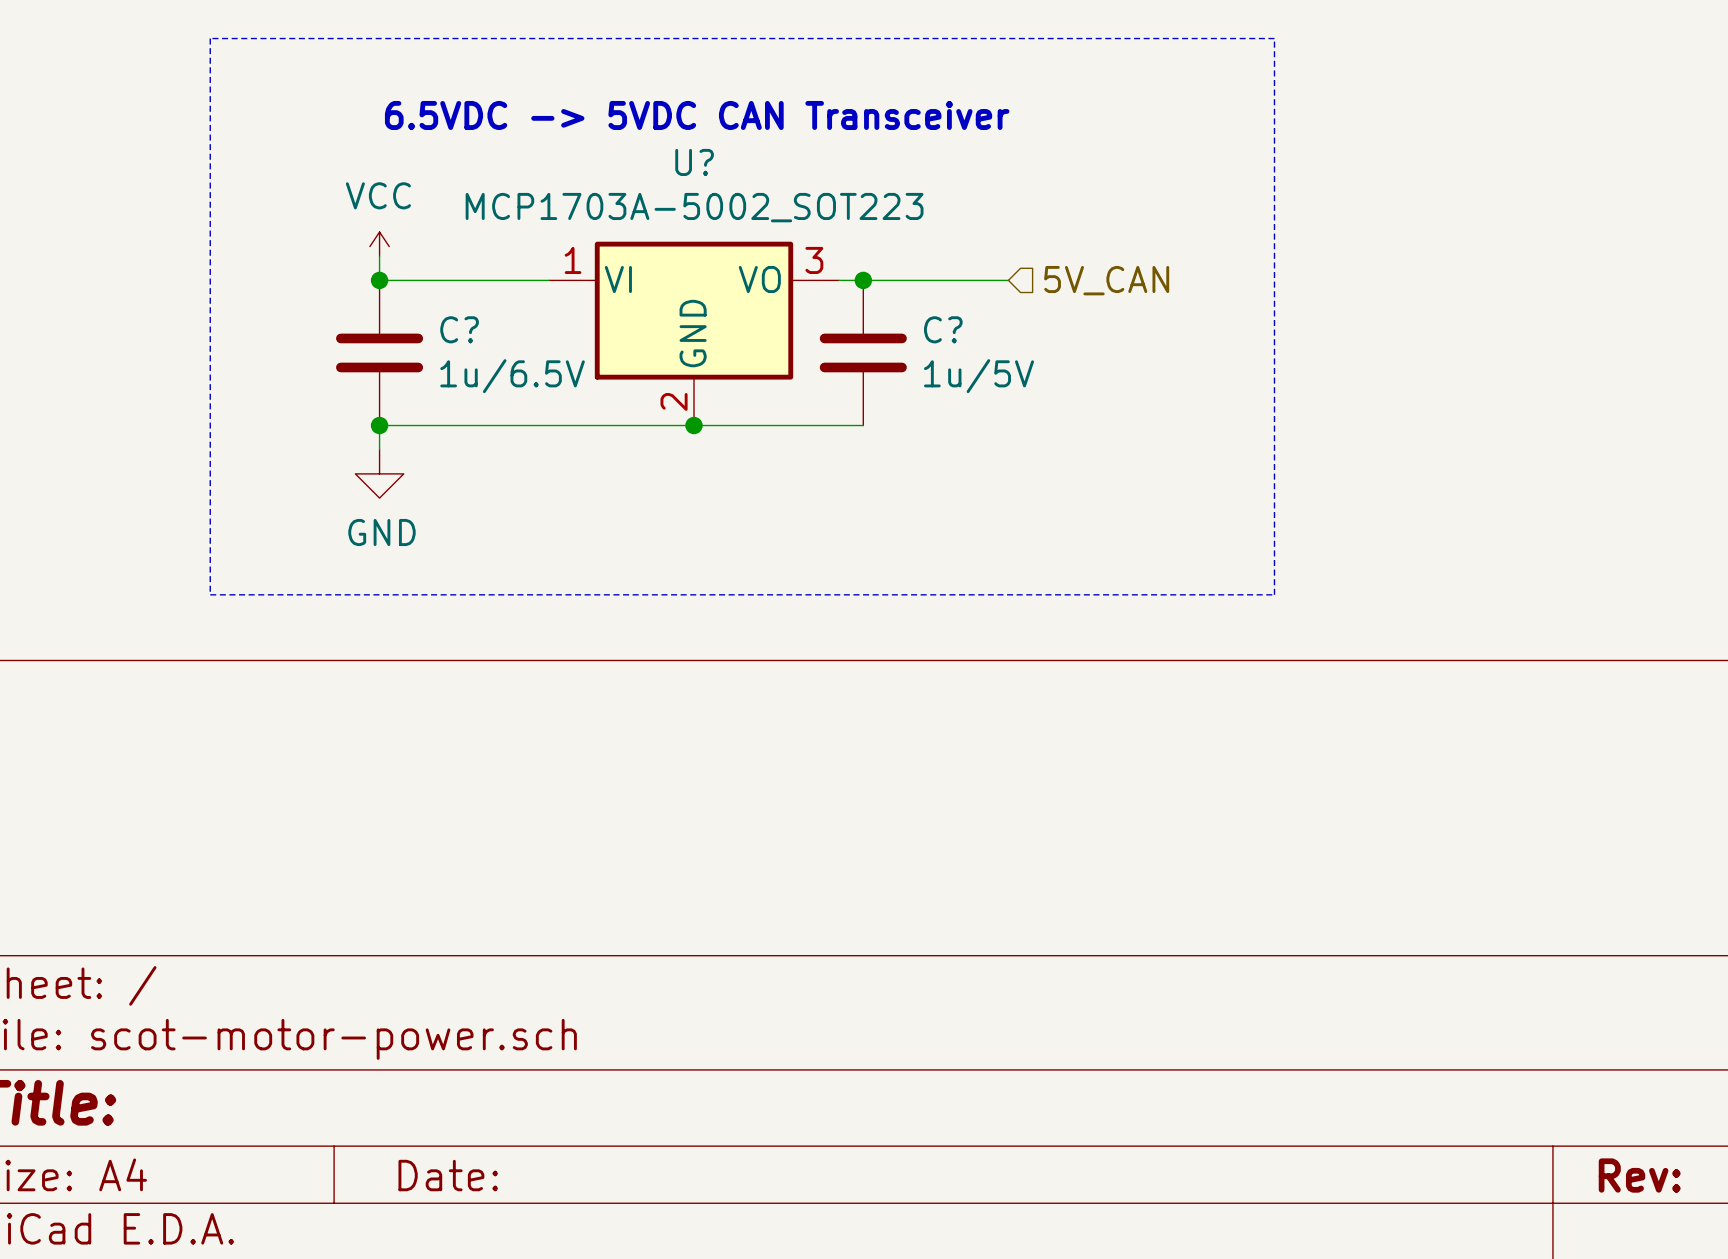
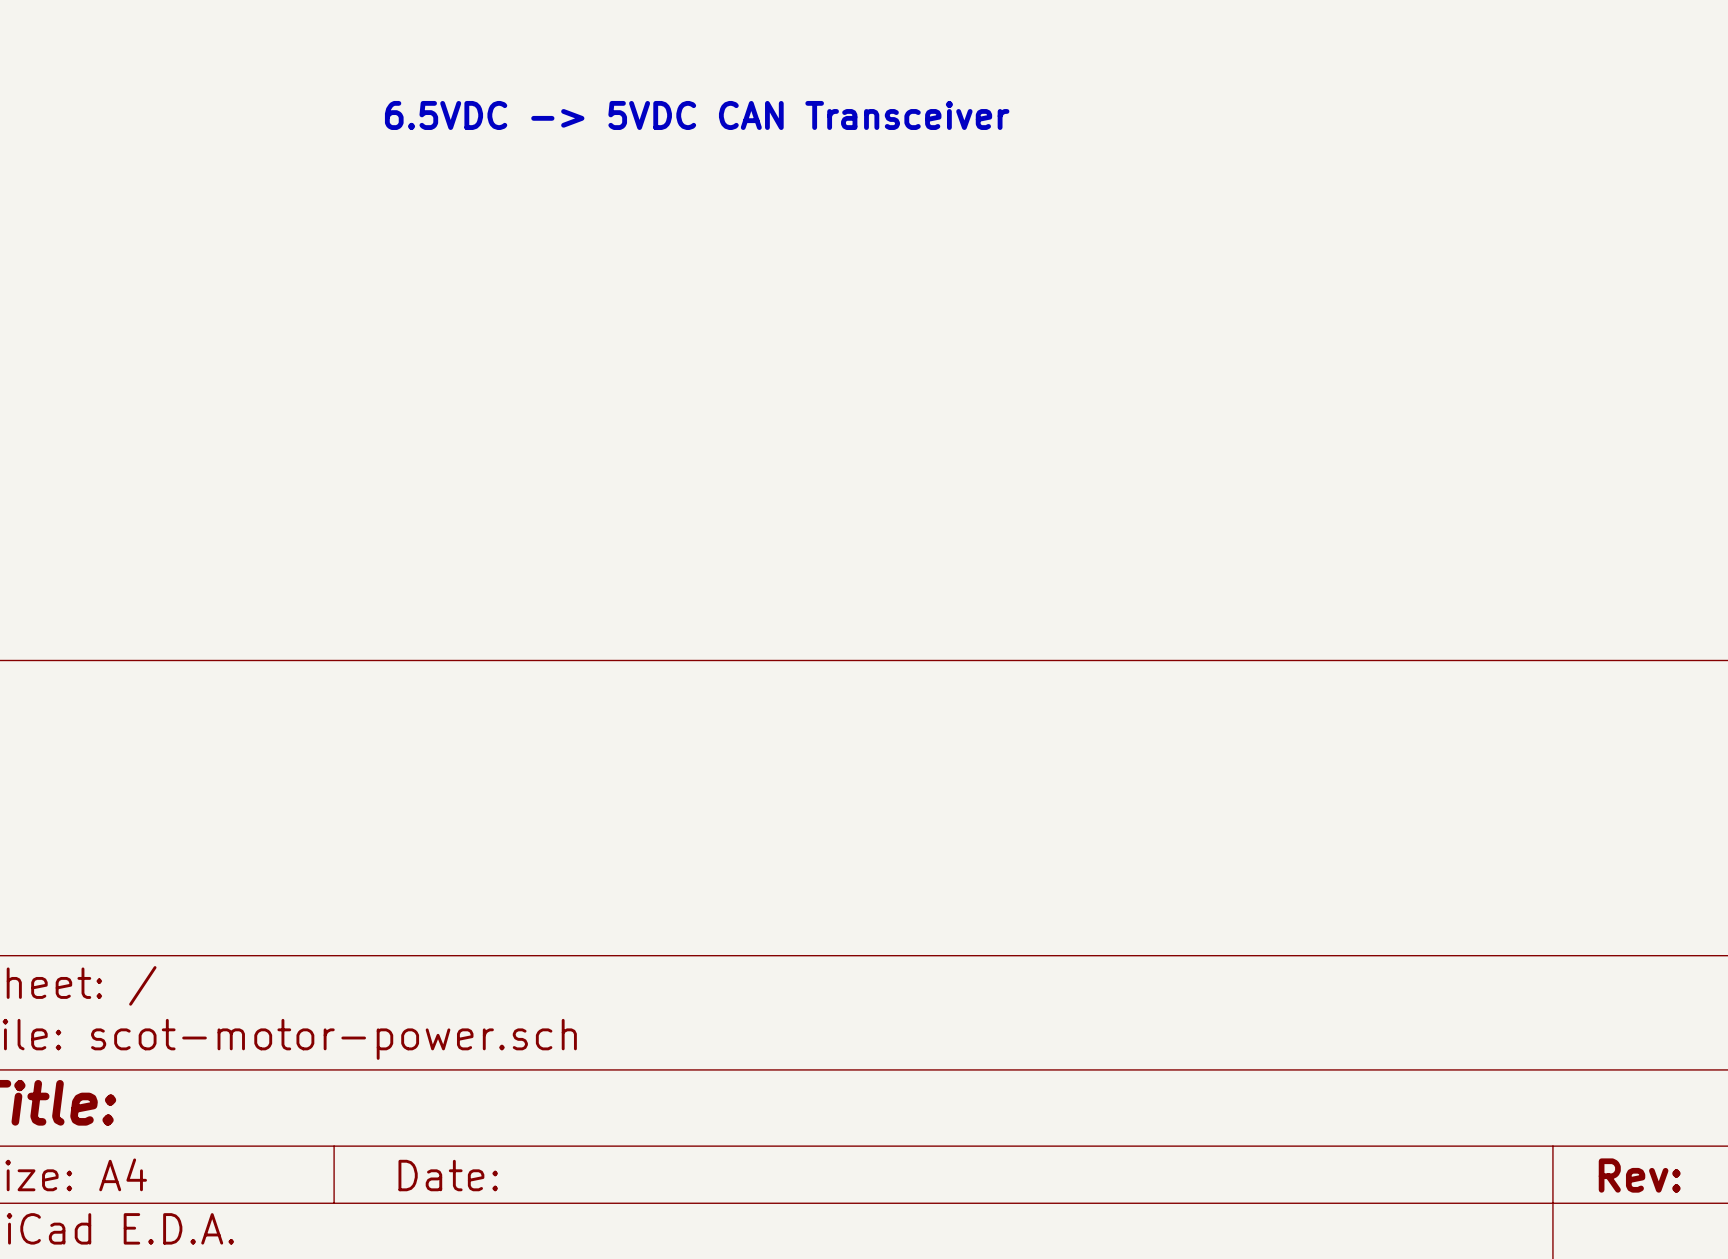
line: (210, 38) (210, 594) (1274, 594) (1274, 38) (210, 38) -> none
power symbol: VCC (379, 244) -> none
wire: (379, 256) (379, 280) (548, 280) -> none
junction: (379, 280) -> none
wire: (839, 280) (1008, 280) -> none
junction: (863, 280) -> none
hierarchical label: 5V_CAN (1106, 280) -> none
U?: MCP1703A-5002_SOT223 (693, 333) -> none
C?: 1u/6.5V (379, 352) -> none
C?: 1u/5V (863, 352) -> none
junction: (379, 425) -> none
junction: (693, 425) -> none
wire: (863, 425) (379, 425) (379, 449) -> none
power symbol: GND (379, 473) -> none

